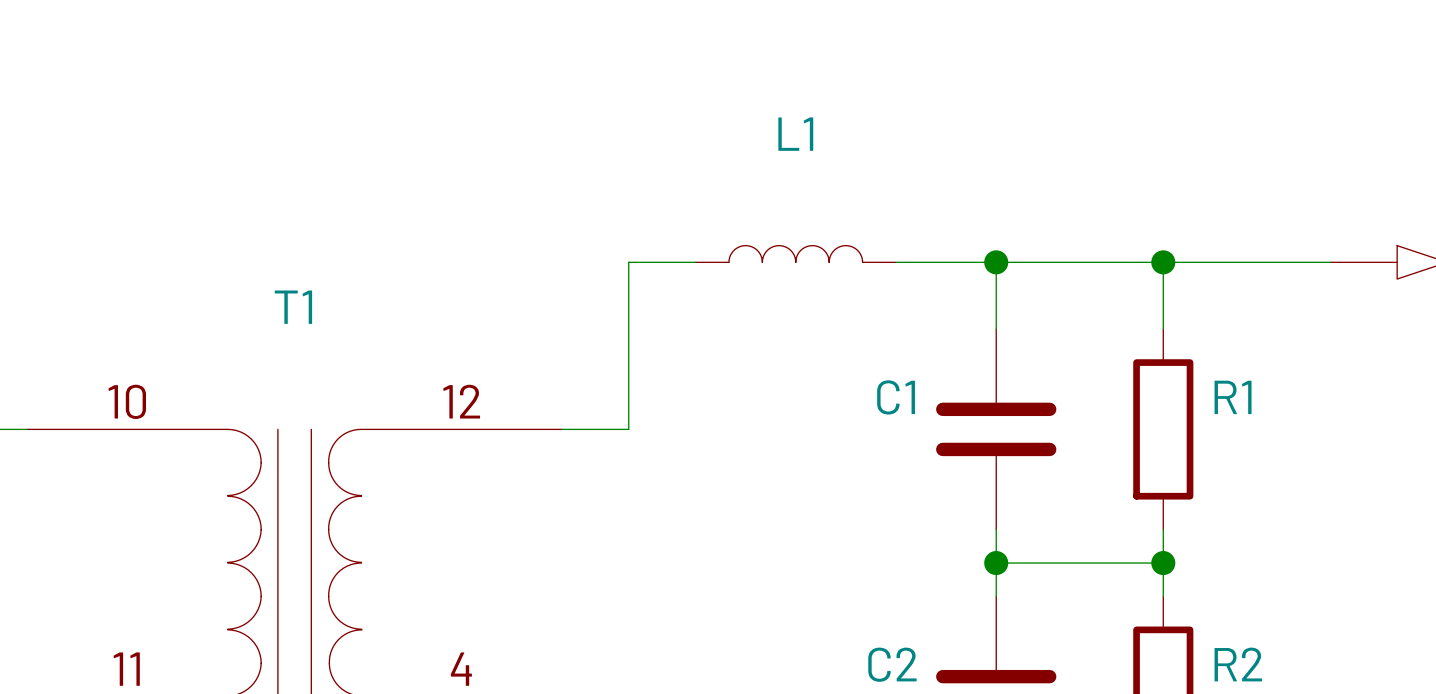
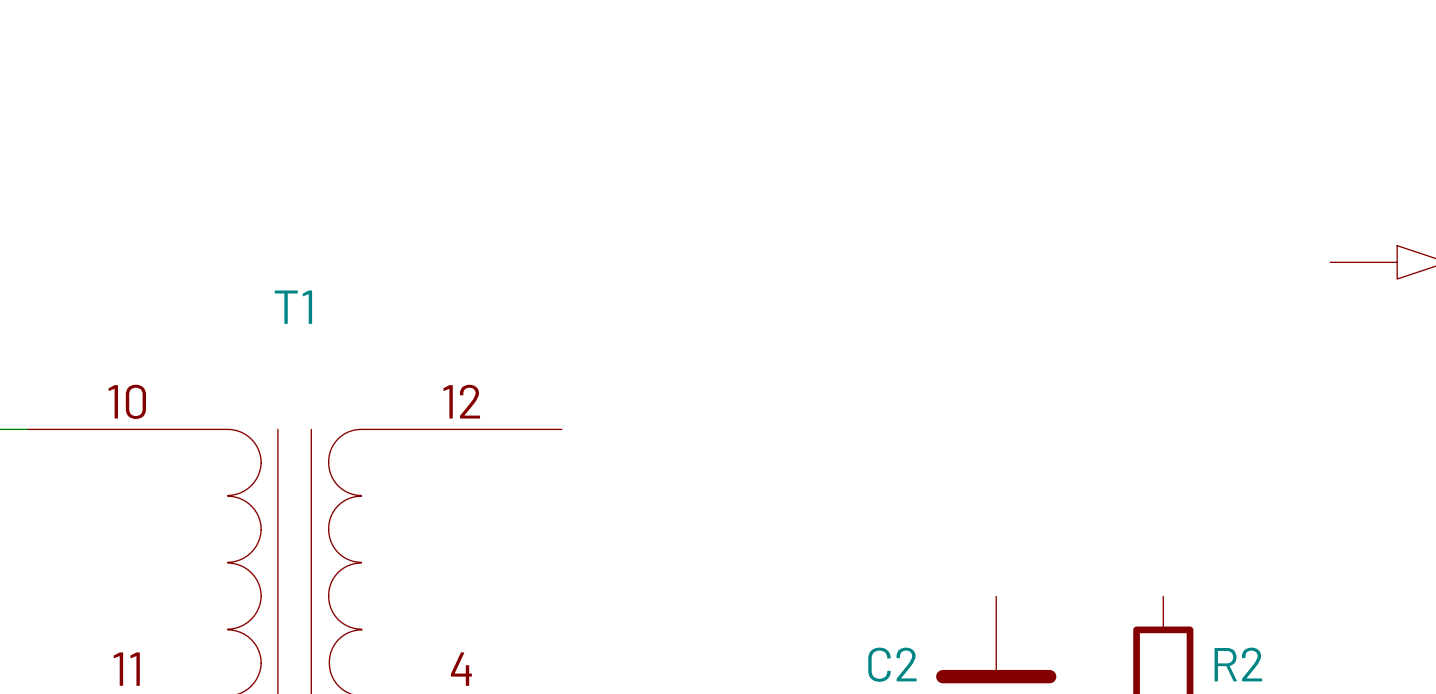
L1: (795, 253) -> none
wire: (695, 262) (628, 262) (628, 429) (561, 429) -> none
wire: (896, 262) (1330, 262) -> none
wire: (996, 262) (996, 329) -> none
junction: (996, 262) -> none
wire: (1163, 262) (1163, 329) -> none
junction: (1163, 262) -> none
C1: (996, 429) -> none
R1: (1163, 429) -> none
wire: (996, 529) (996, 596) -> none
wire: (1163, 529) (1163, 596) -> none
wire: (996, 563) (1163, 563) -> none
junction: (996, 563) -> none
junction: (1163, 563) -> none

